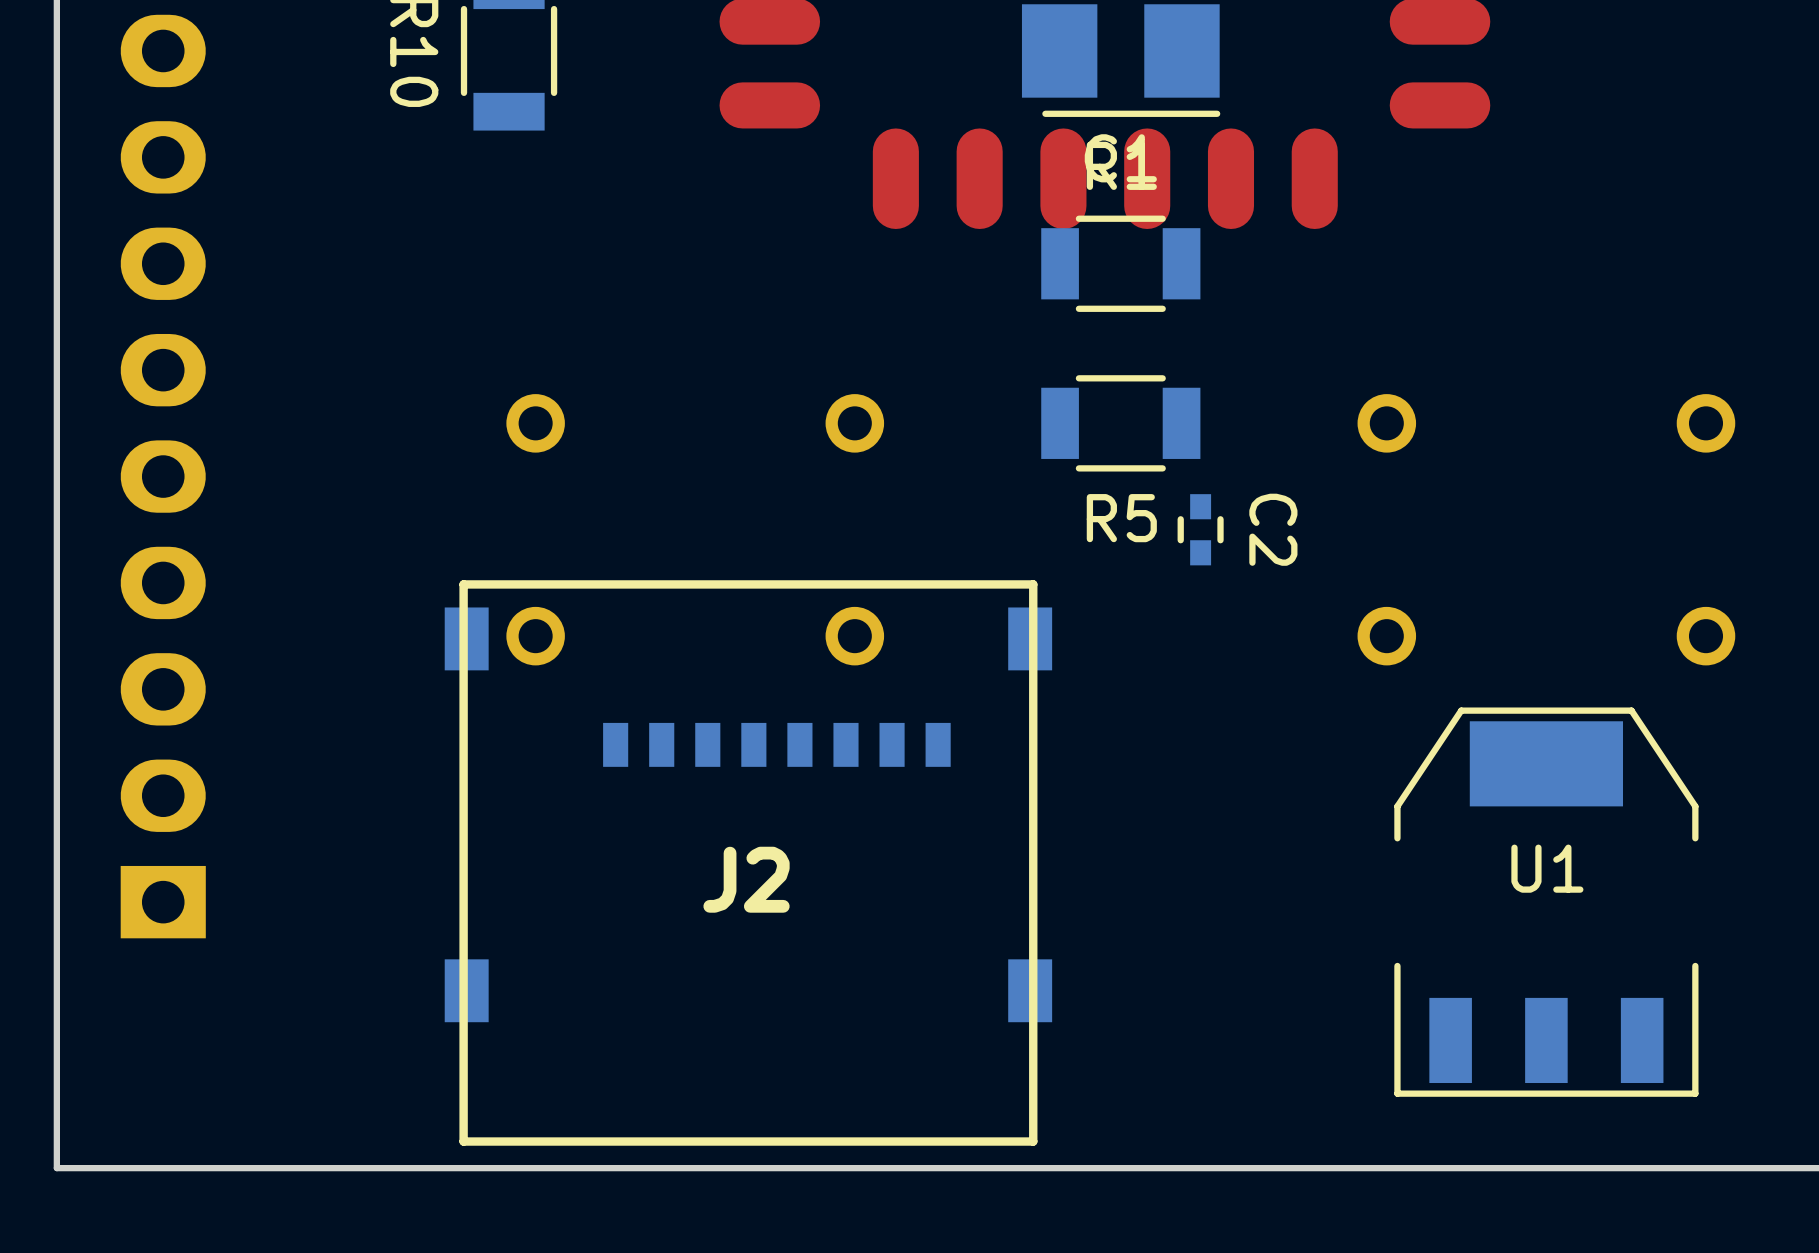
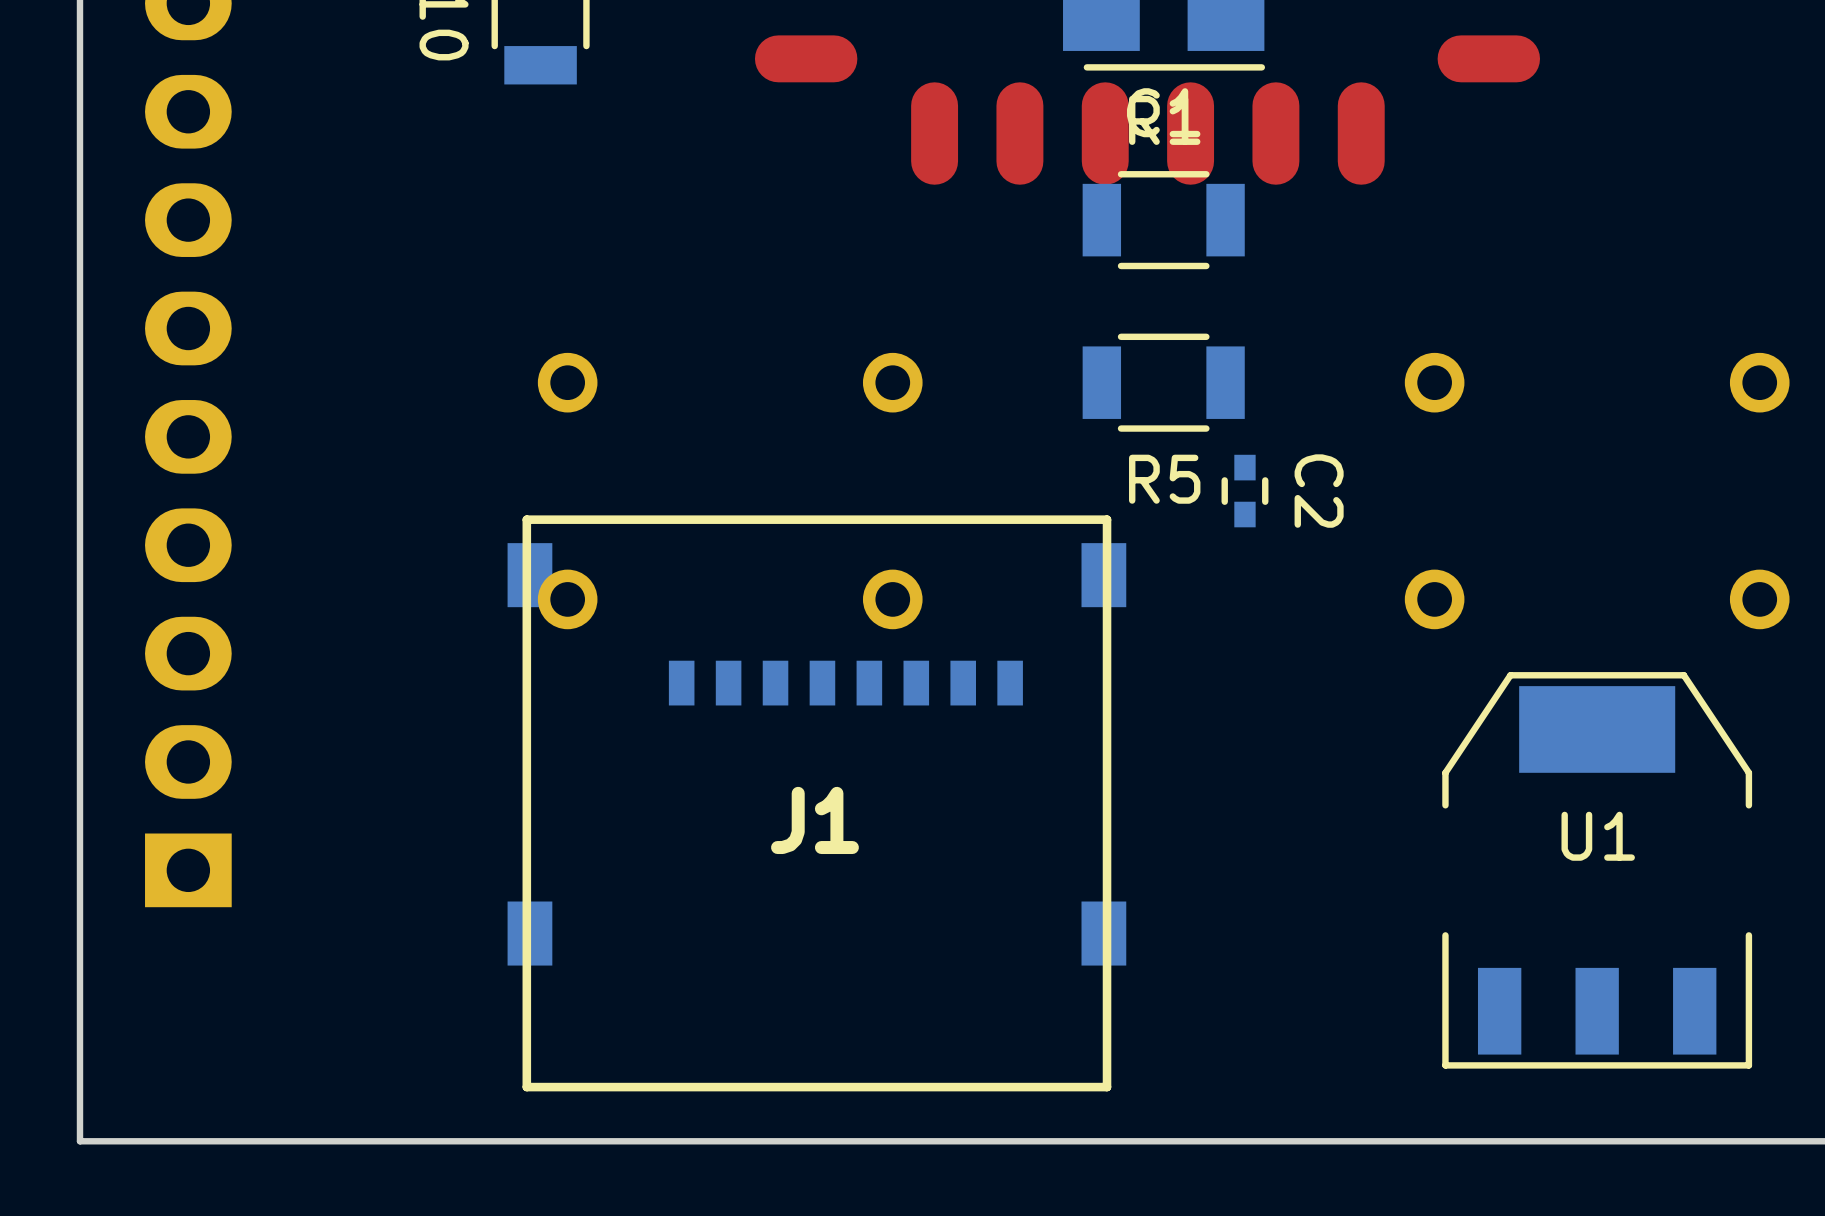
J2 position: (748, 862) -> (816, 803)
J2 name: J2 (746, 879) -> J1 (814, 820)

